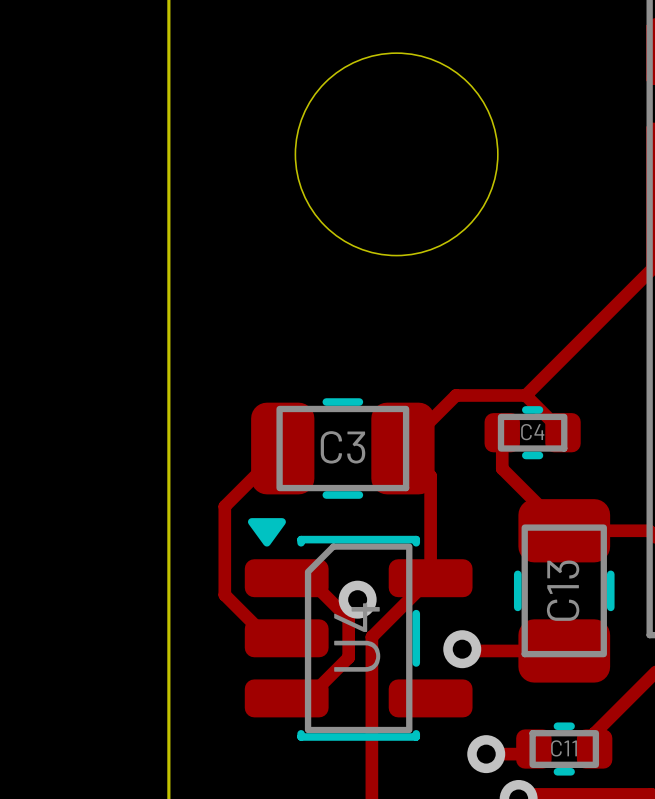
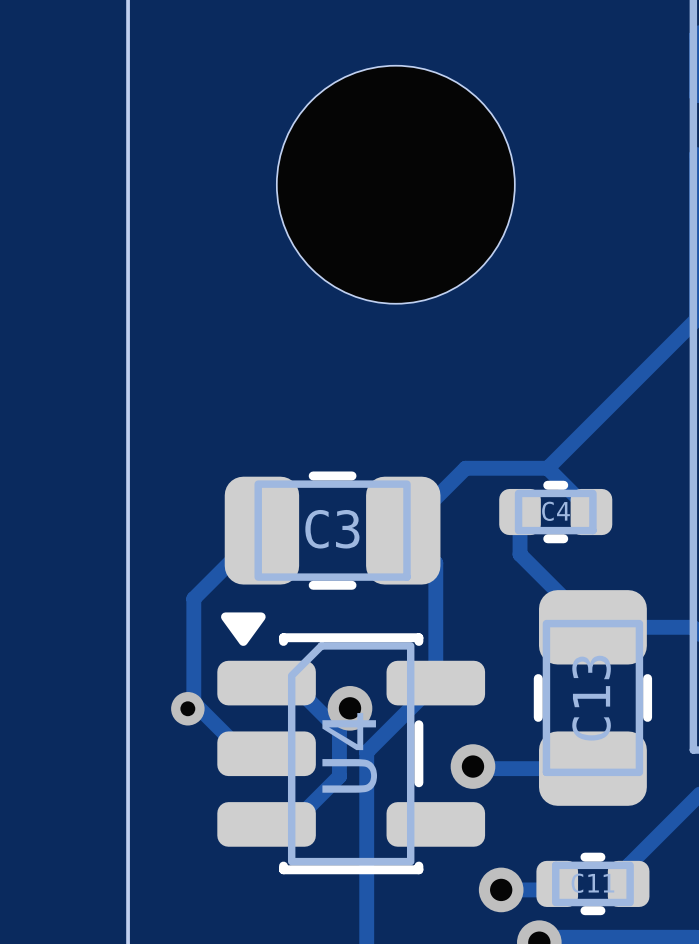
via: none -> (187, 708)

